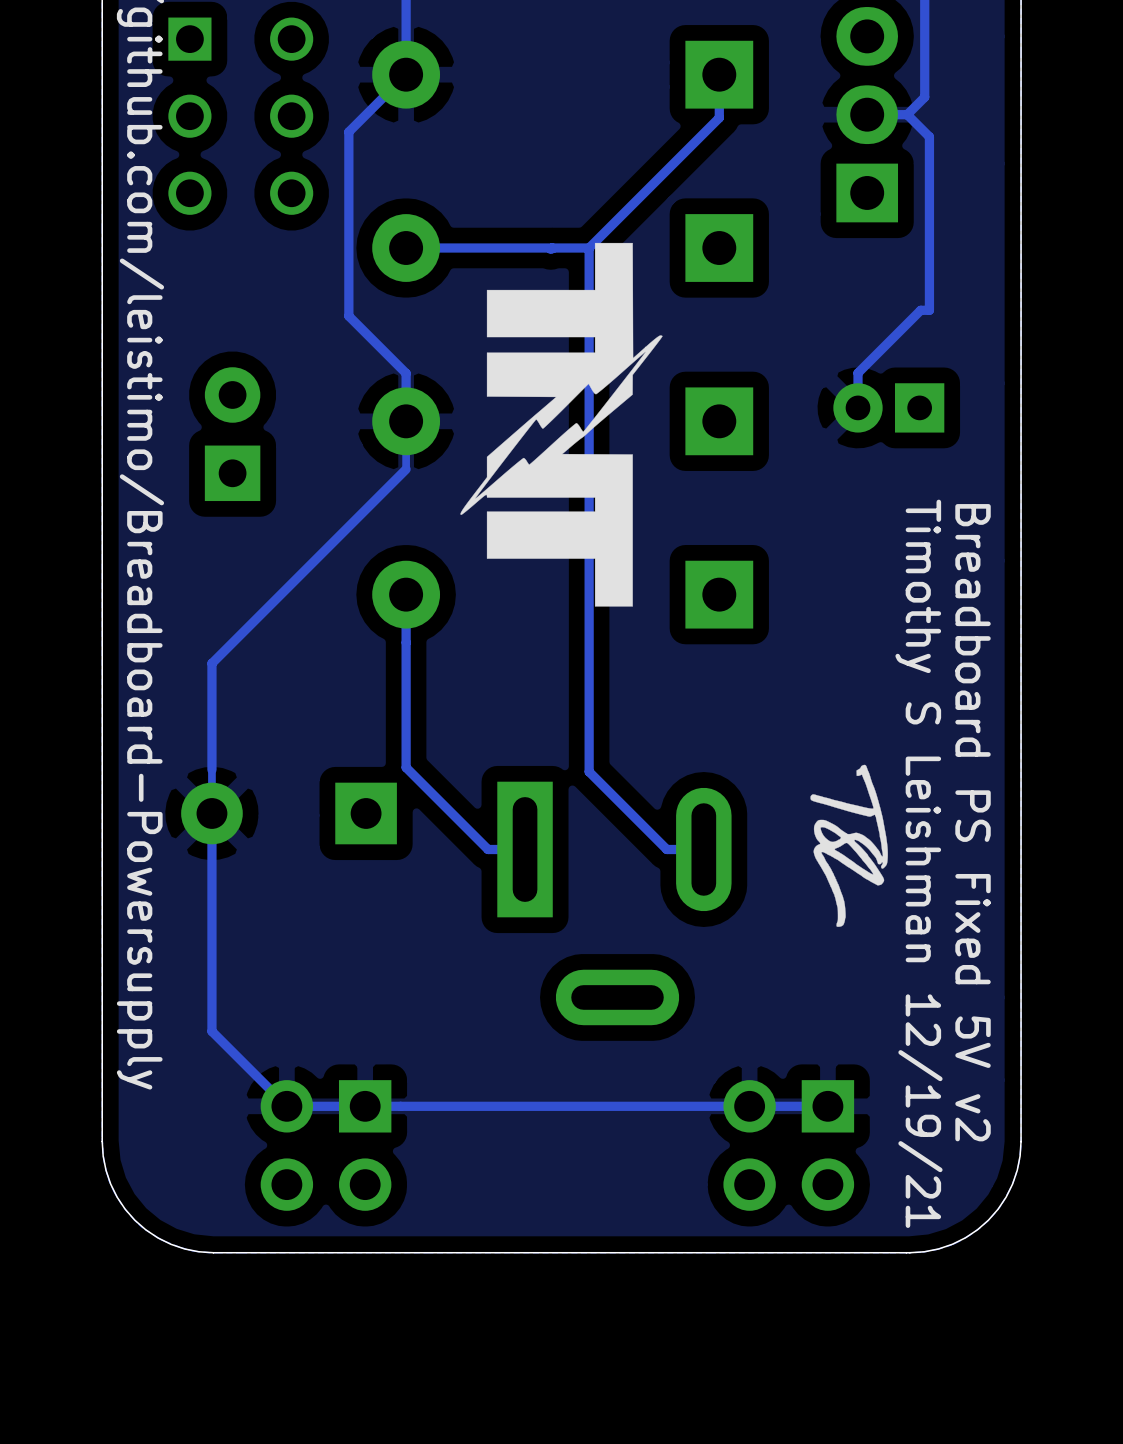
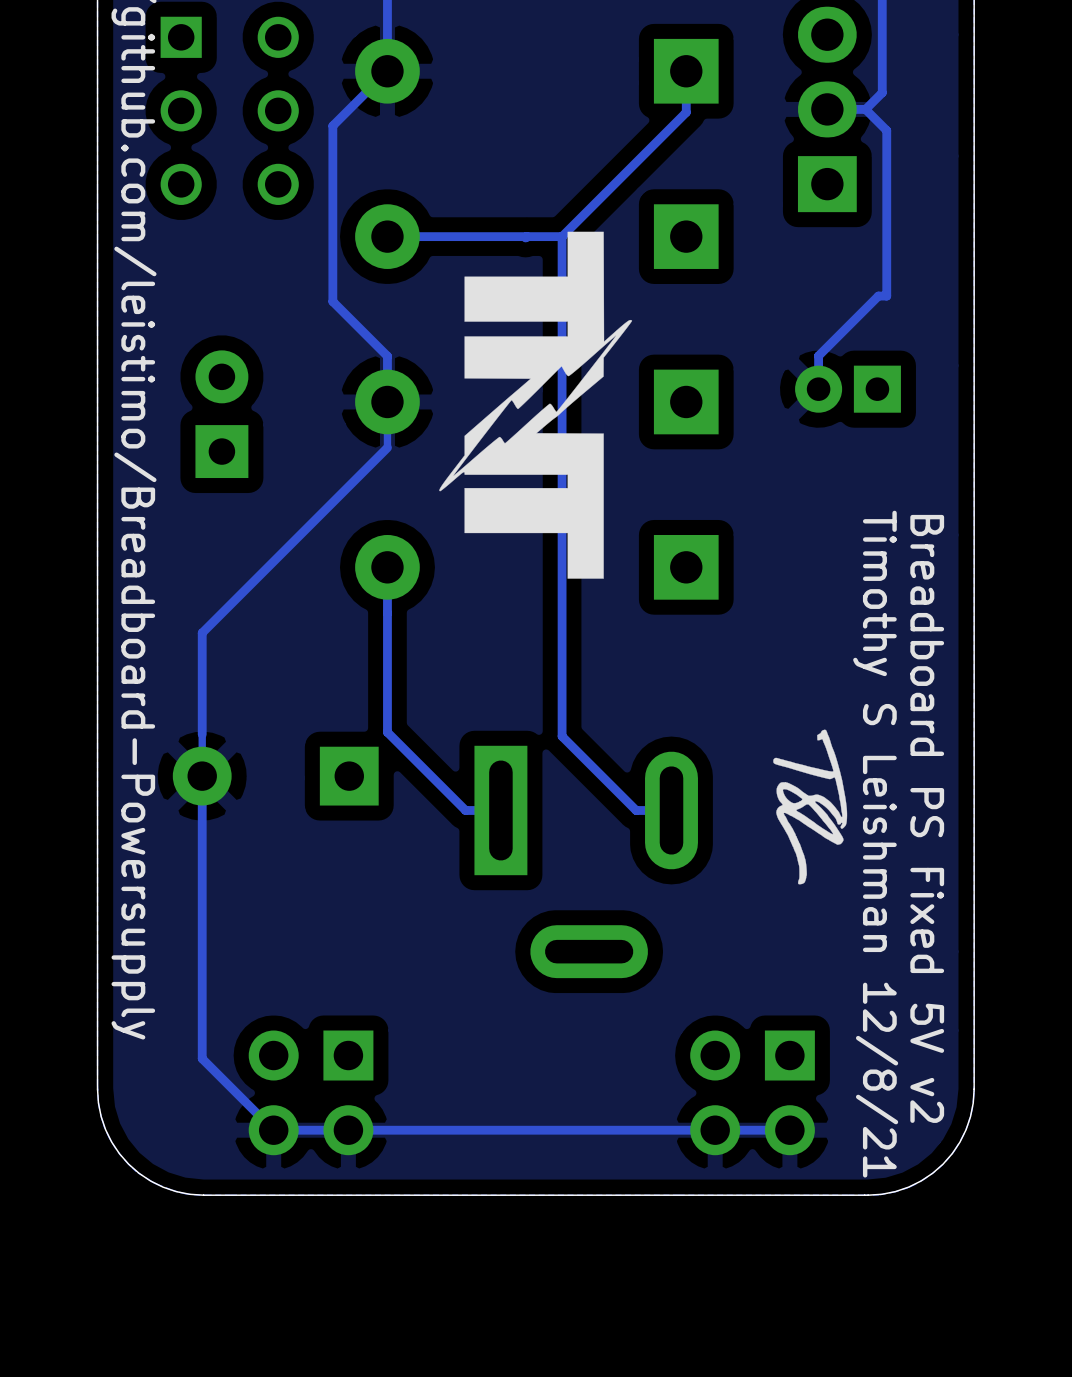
text position: Breadboard PS Fixed 5V v2 (973, 822) -> Breadboard PS Fixed 5V v2 (927, 818)
text: Timothy S Leishman 12/19/21 (918, 863) -> Timothy S Leishman 12/8/21 (875, 844)
track: (211, 1031) (286, 1106) (827, 1106) -> (202, 984) (202, 1058) (273, 1130) (789, 1130)

